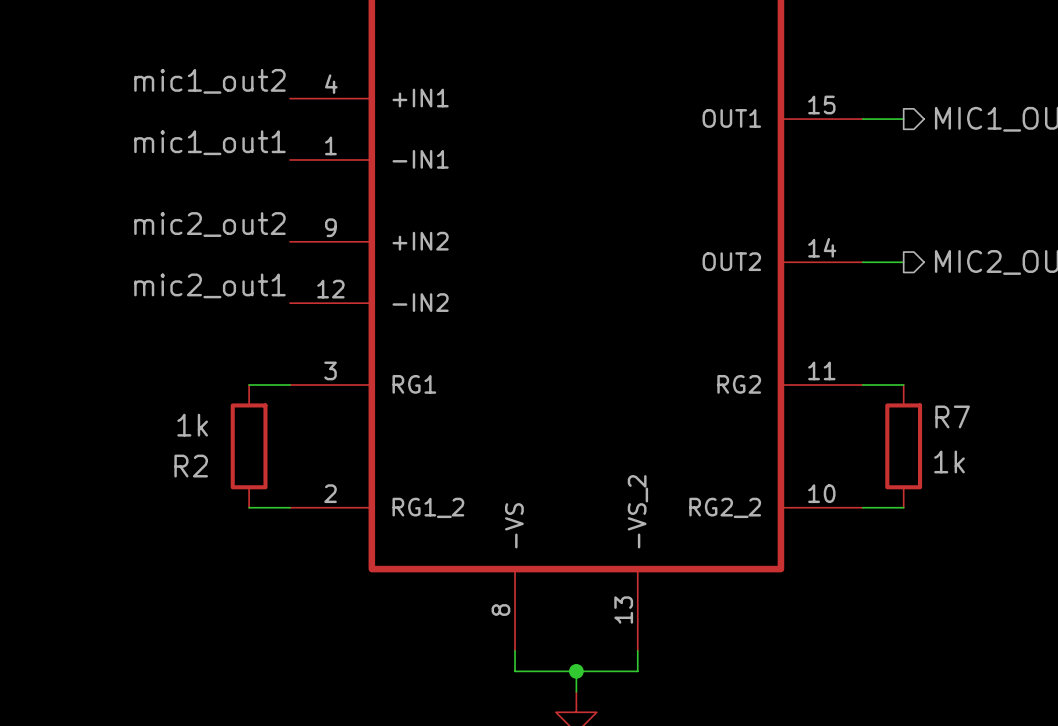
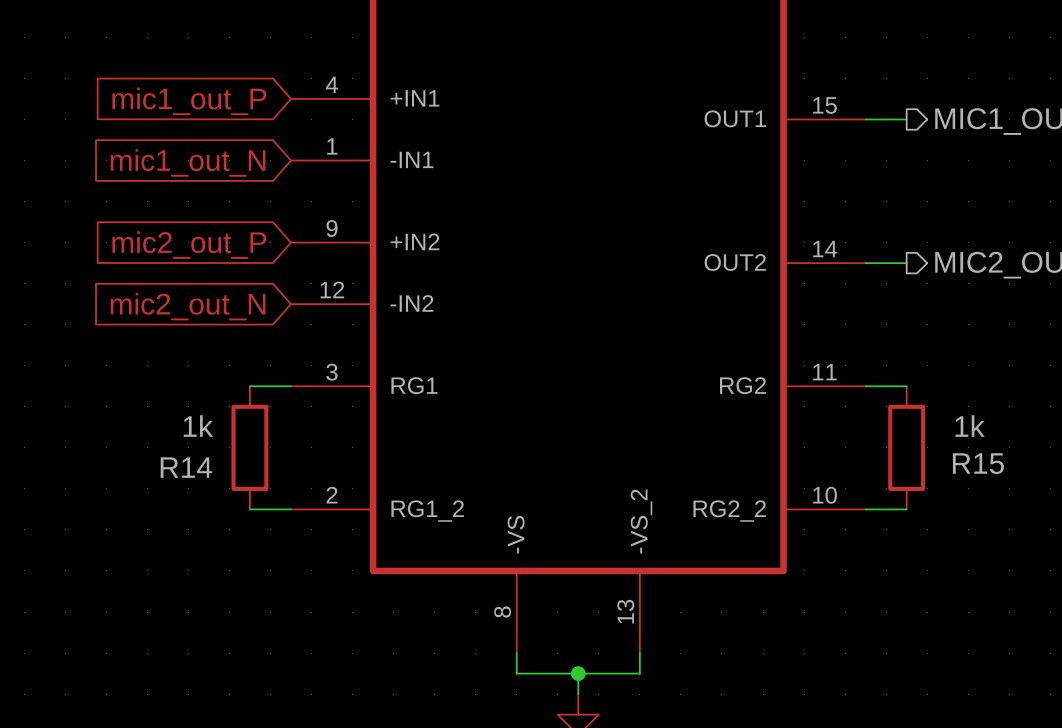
label: mic1_out2 (209, 81) -> none
global label: none -> mic1_out_P (189, 101)
label: mic1_out1 (209, 142) -> none
global label: none -> mic1_out_N (188, 162)
label: mic2_out2 (209, 224) -> none
global label: none -> mic2_out_P (189, 245)
label: mic2_out1 (209, 285) -> none
global label: none -> mic2_out_N (188, 306)
R7 name: R7 (952, 416) -> R15 (978, 463)
R7 value position: 1k (949, 461) -> 1k (970, 426)
R2 name: R2 (191, 466) -> R14 (186, 467)

